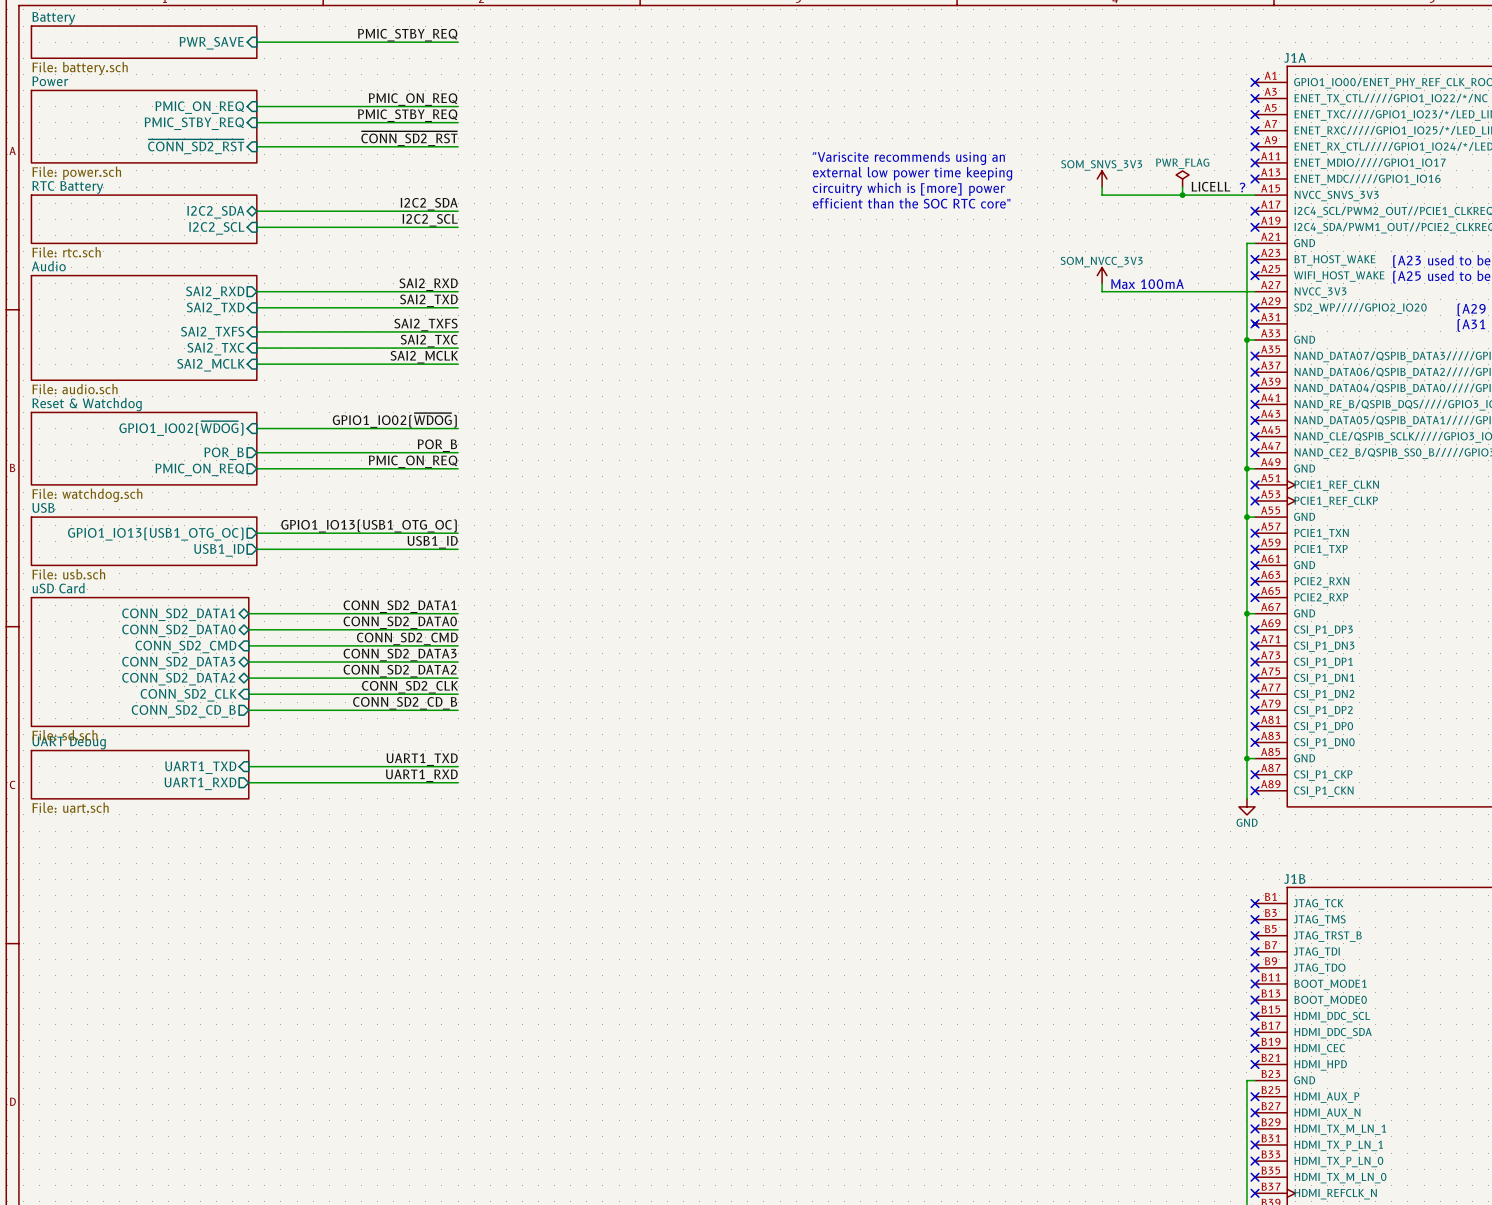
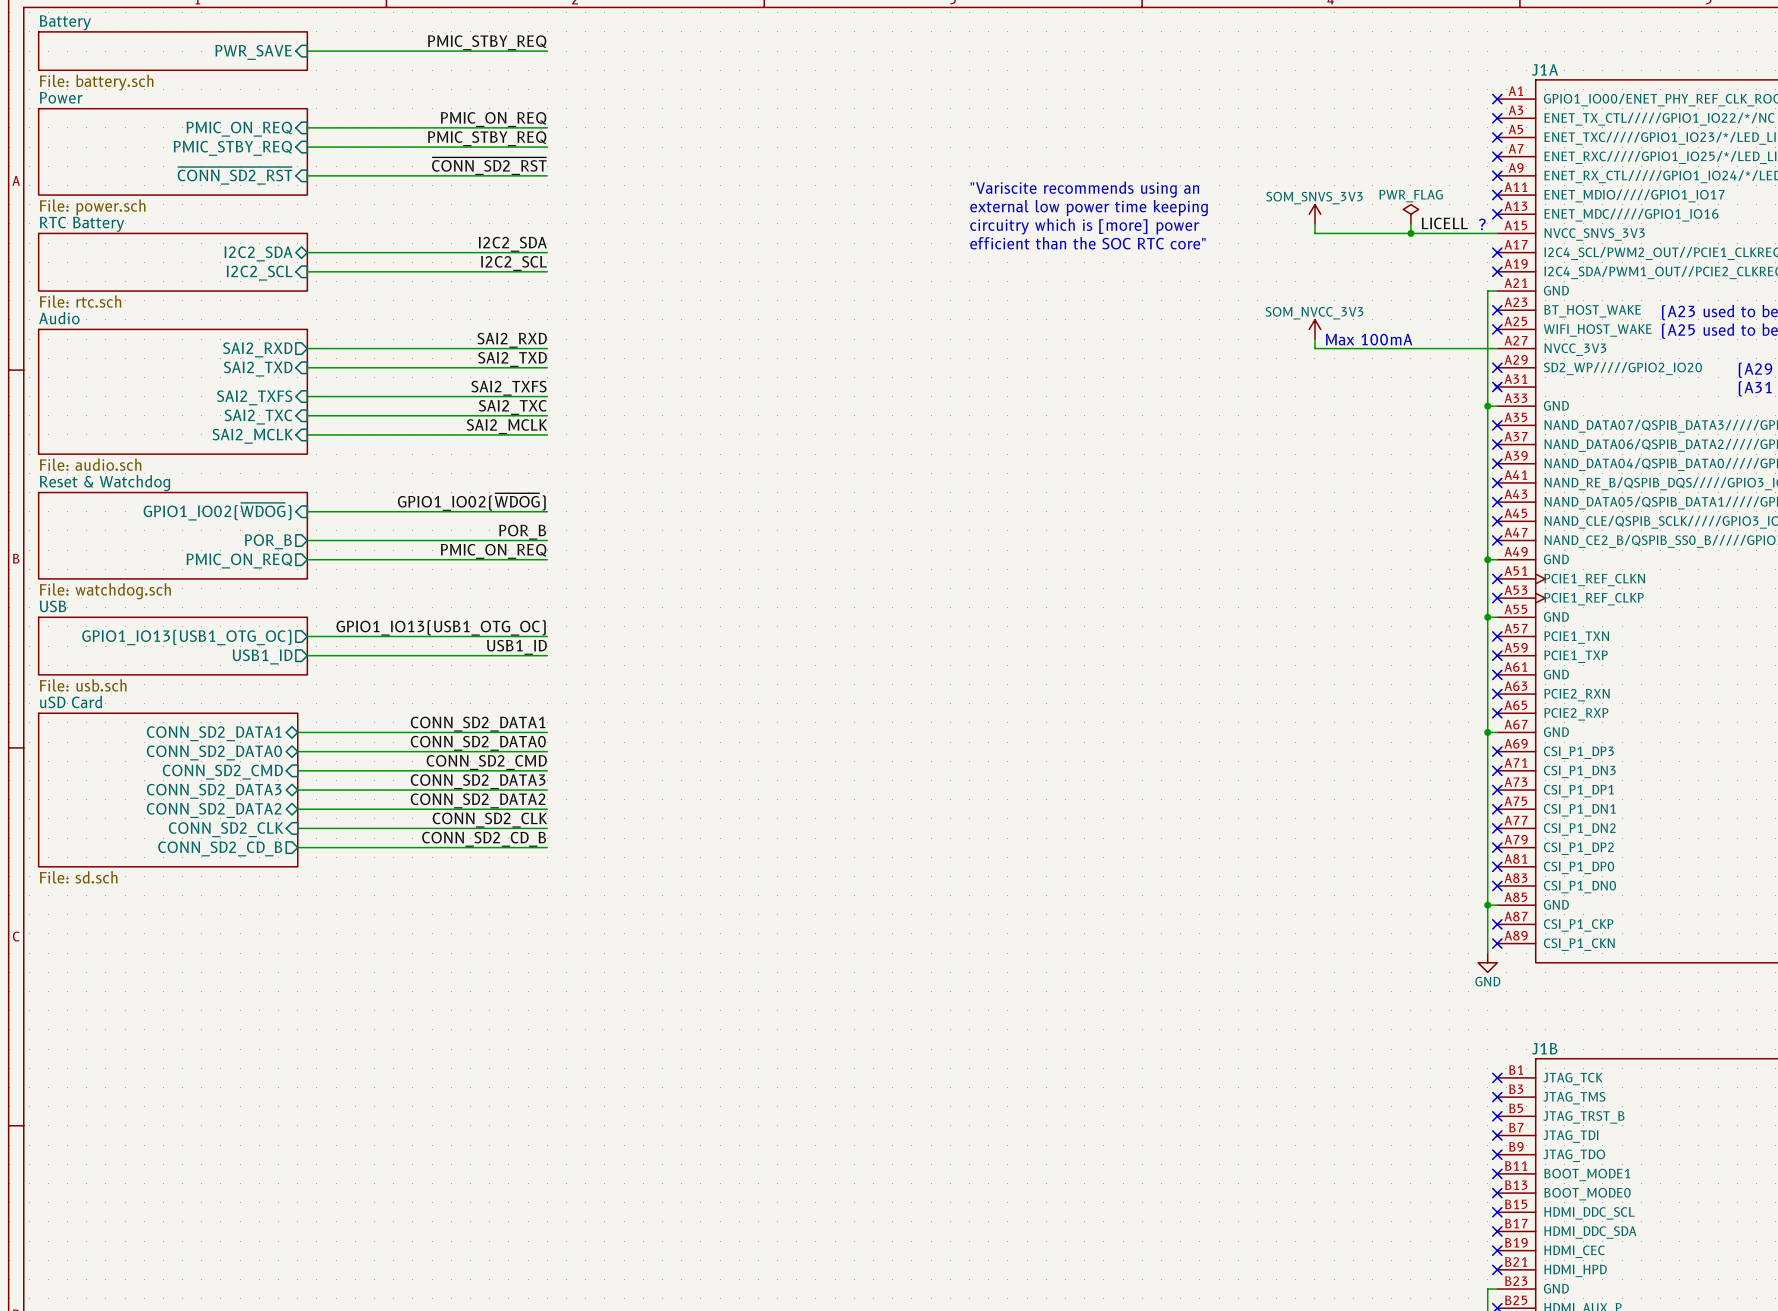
label: UART1_TXD (422, 759) -> none
wire: (248, 766) (458, 766) -> none
sheet pin: UART1_TXD (200, 767) -> none
sheet UART Debug: File: uart.sch (140, 774) -> none
label: UART1_RXD (421, 775) -> none
wire: (248, 782) (458, 782) -> none
sheet pin: UART1_RXD (200, 783) -> none

